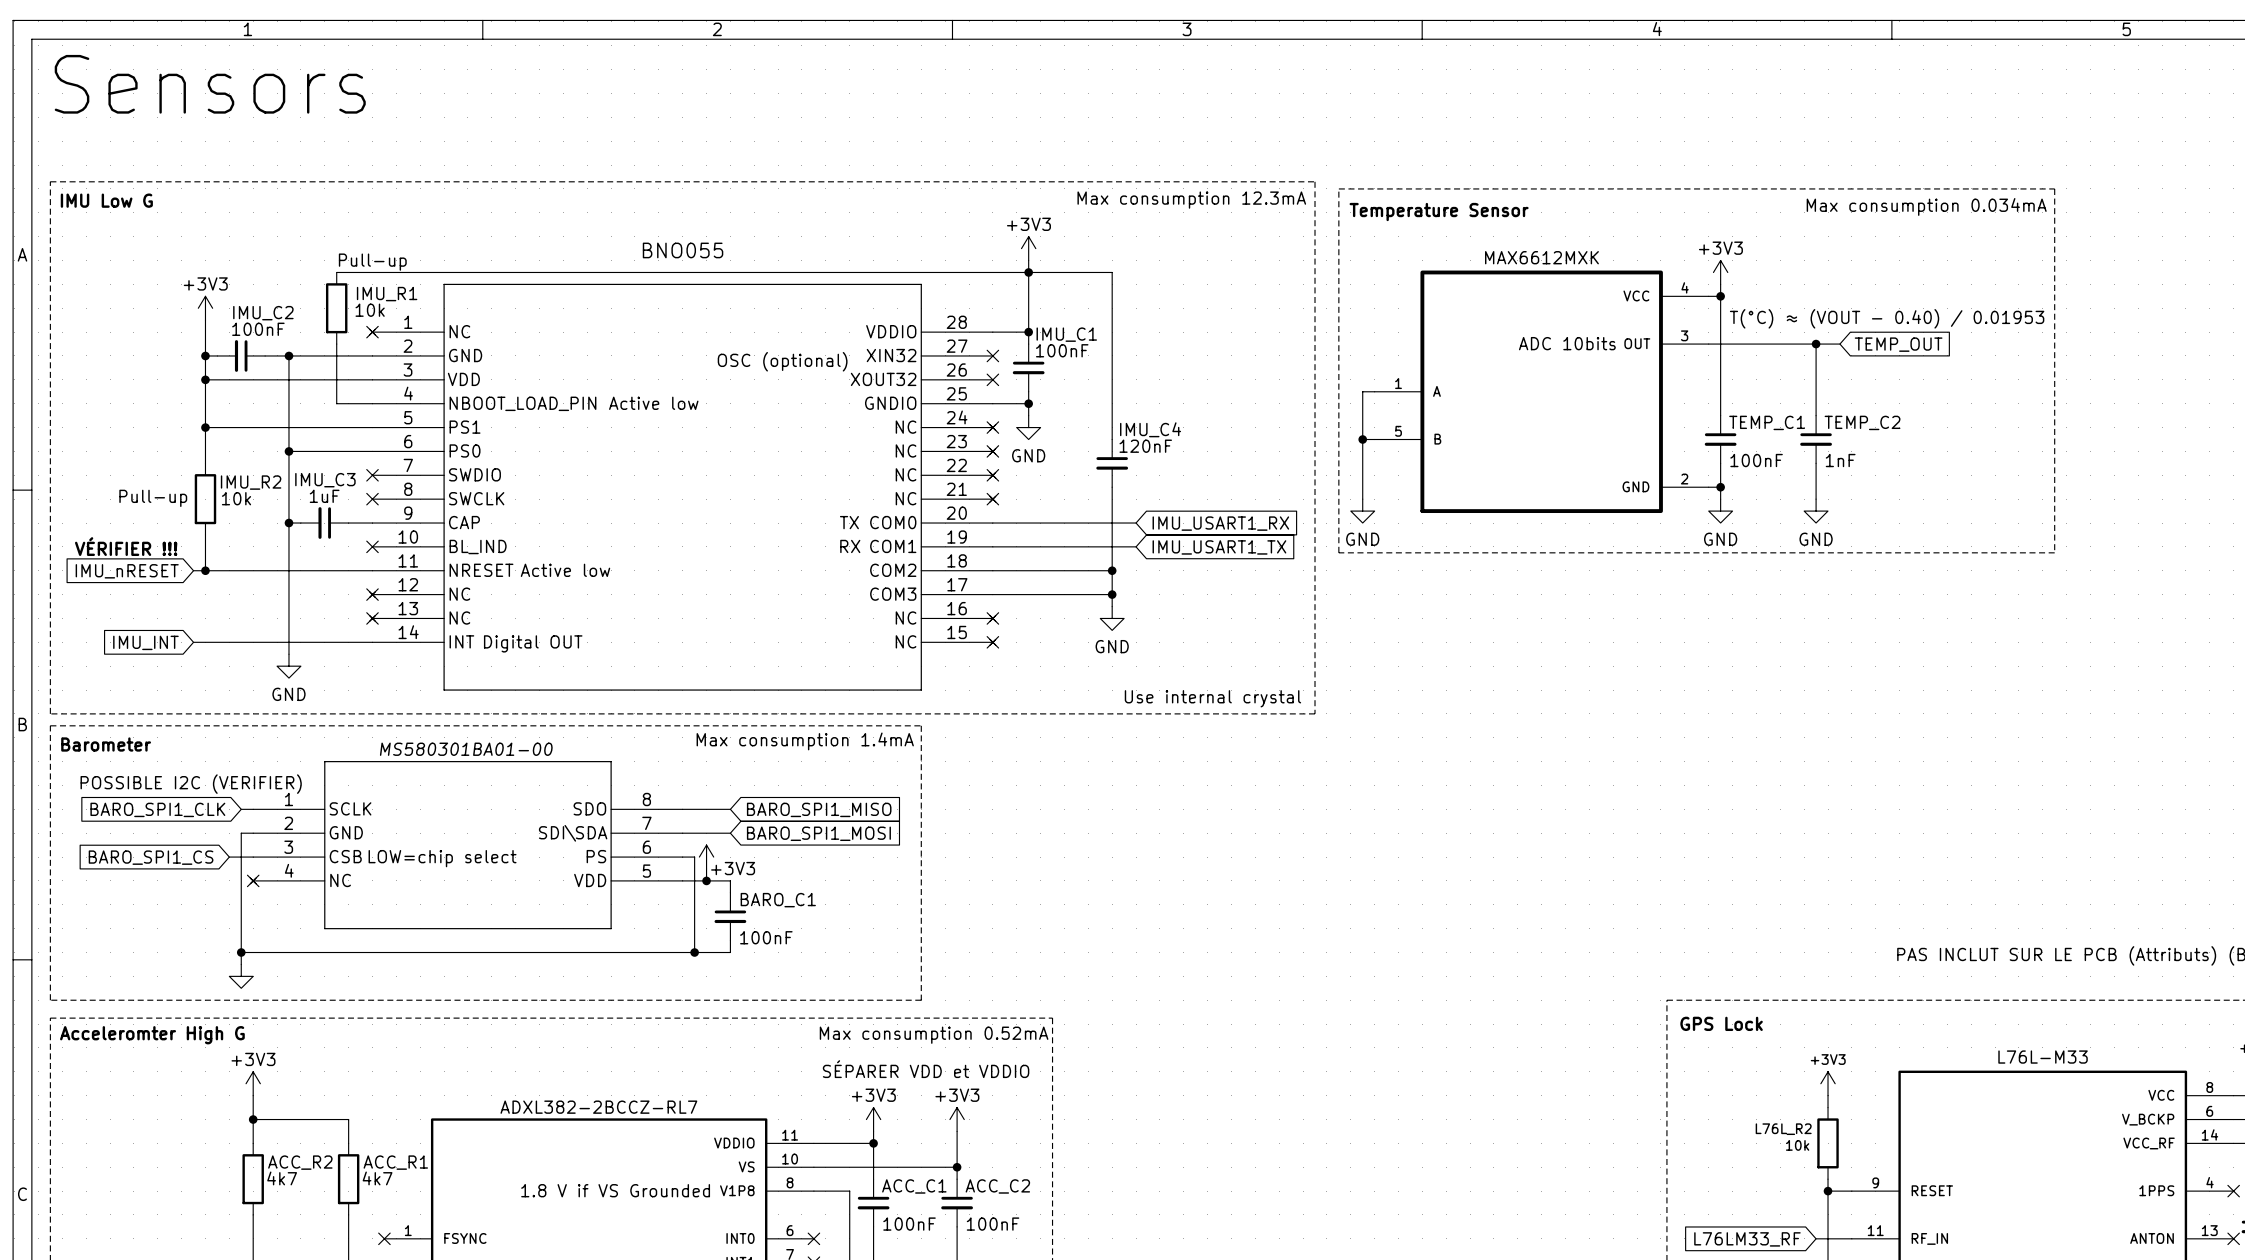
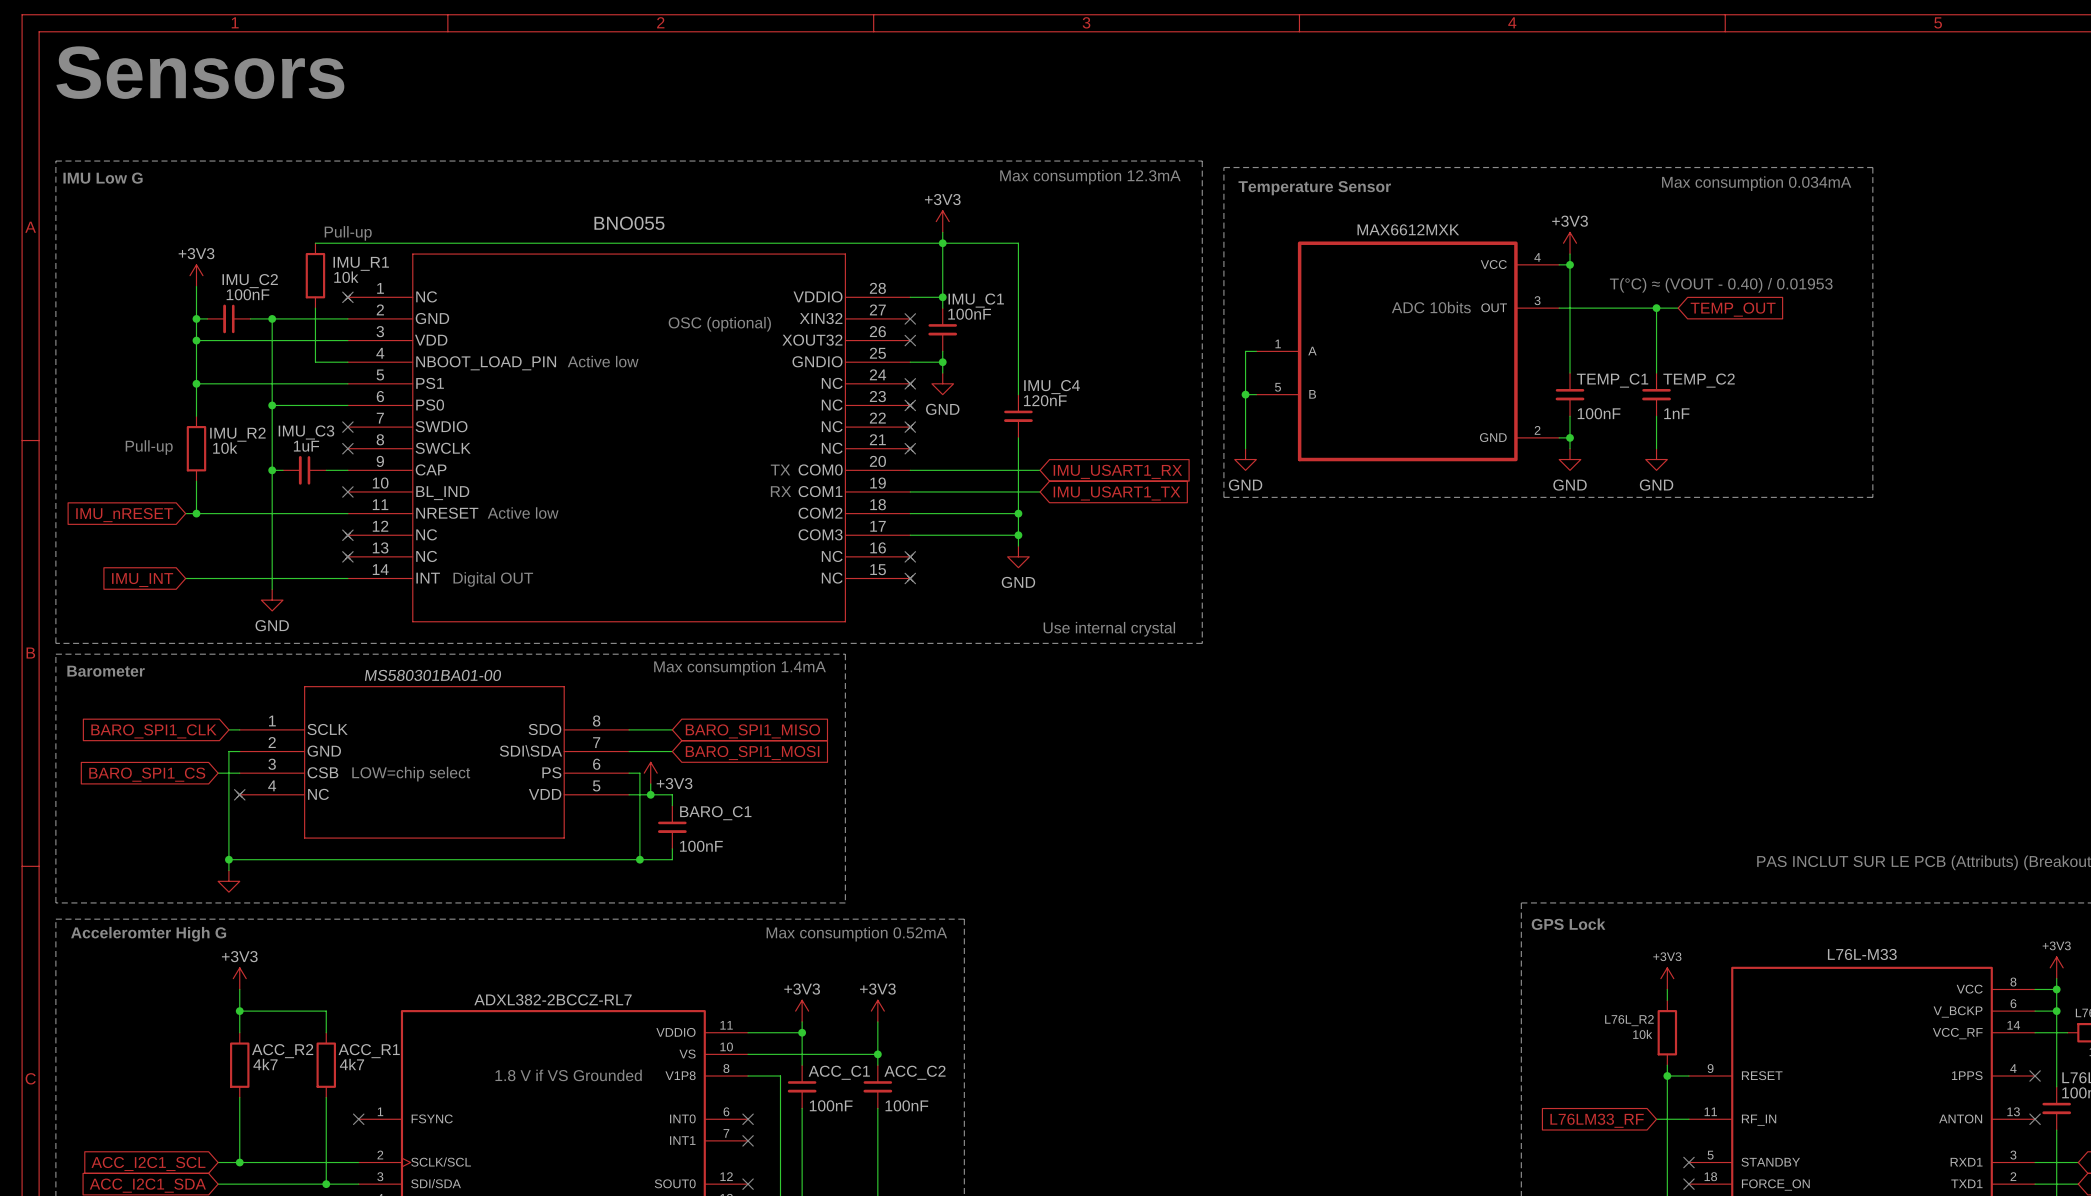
text: VÉRIFIER !!! (126, 546) -> none
text: POSSIBLE I2C (VERIFIER) (191, 784) -> none
text: SÉPARER VDD et VDDIO (926, 1069) -> none

